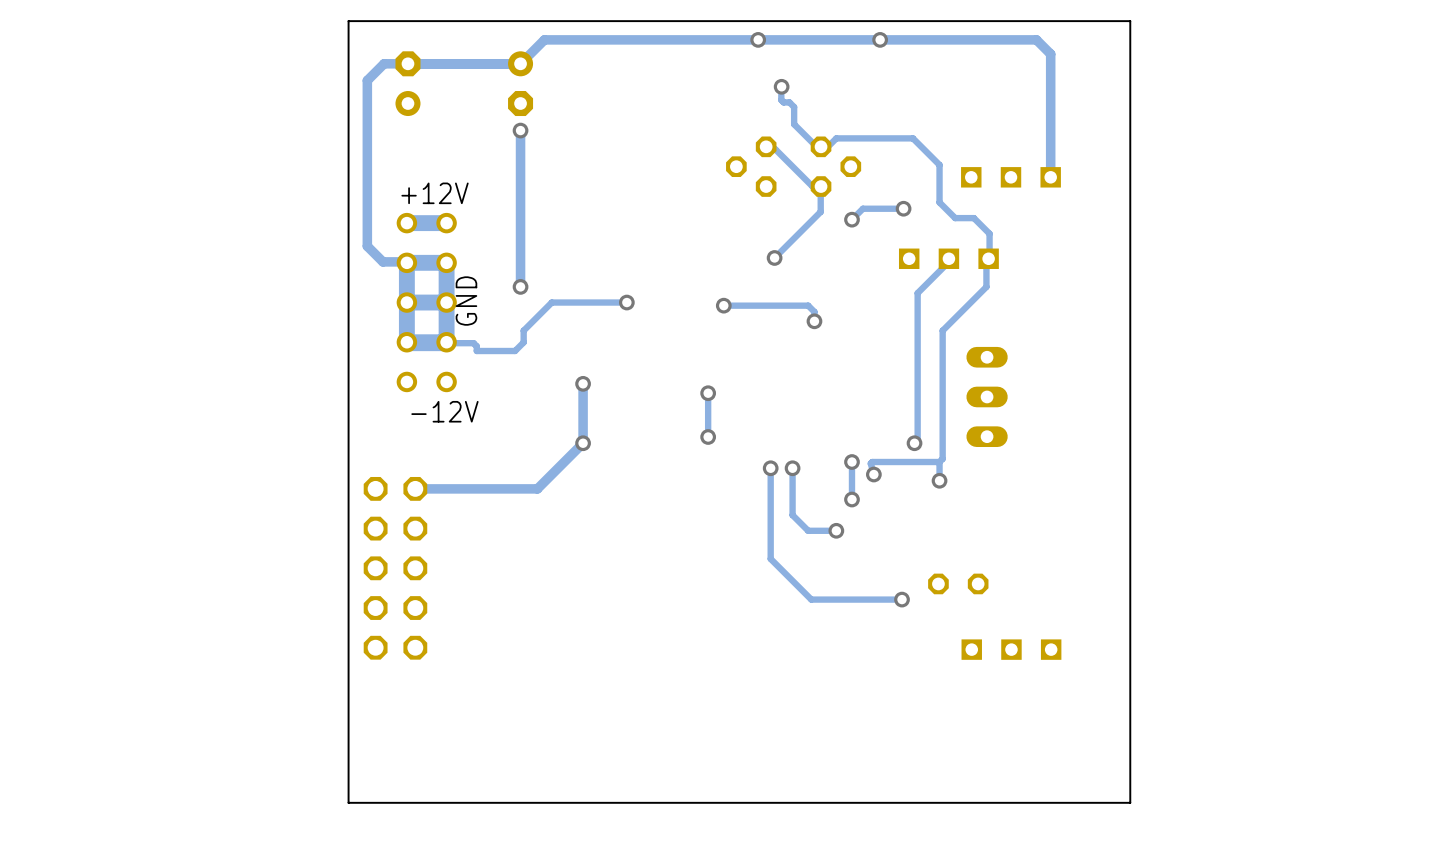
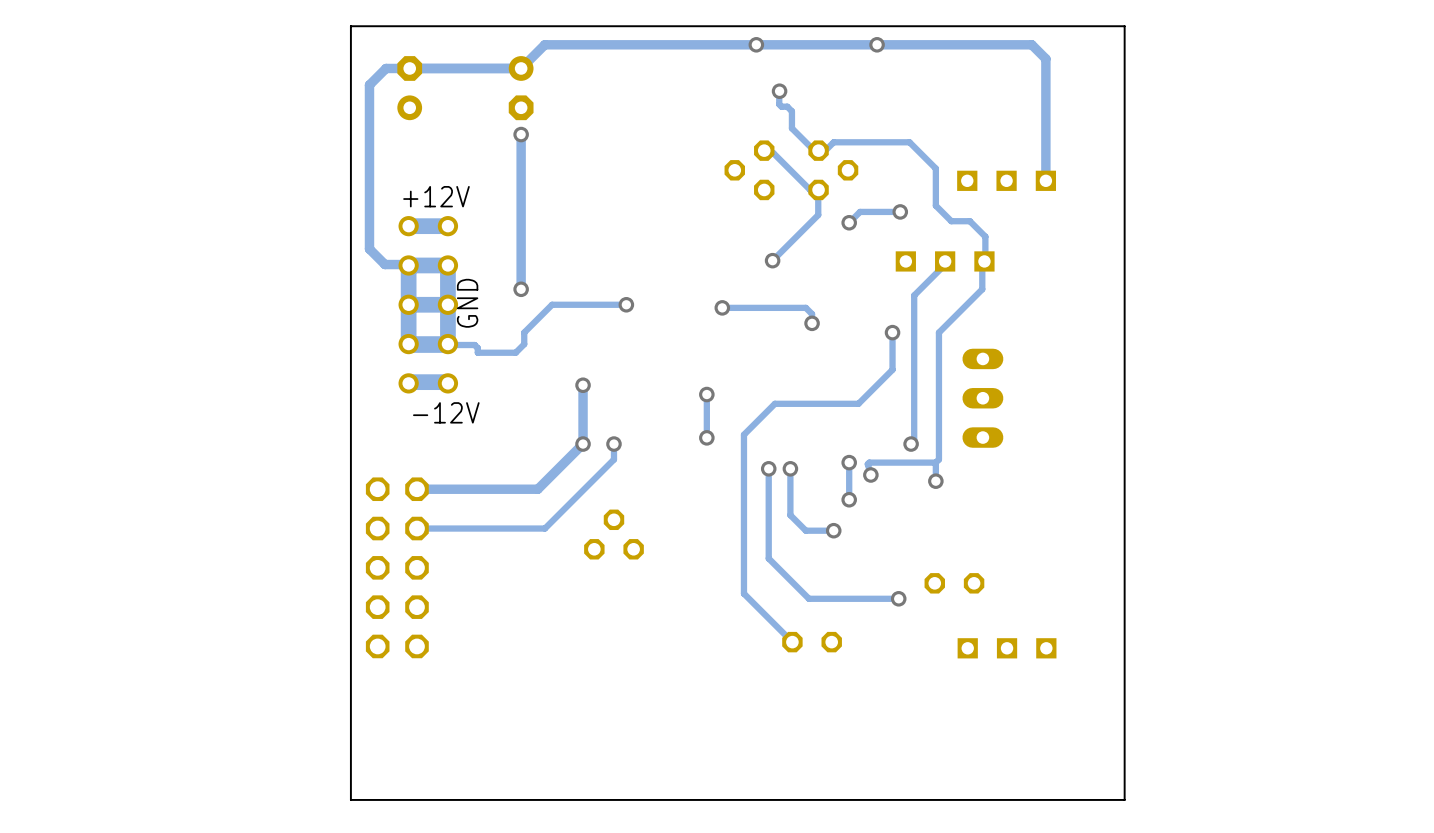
track: none -> (892, 332) (892, 369) (858, 403) (774, 403) (743, 434) (743, 593) (792, 642)
via: none -> (892, 332)
track: none -> (446, 382) (412, 382)
track: none -> (613, 444) (613, 459) (544, 528) (416, 528)
via: none -> (613, 444)
part: none -> (613, 534)
part: none -> (812, 642)

